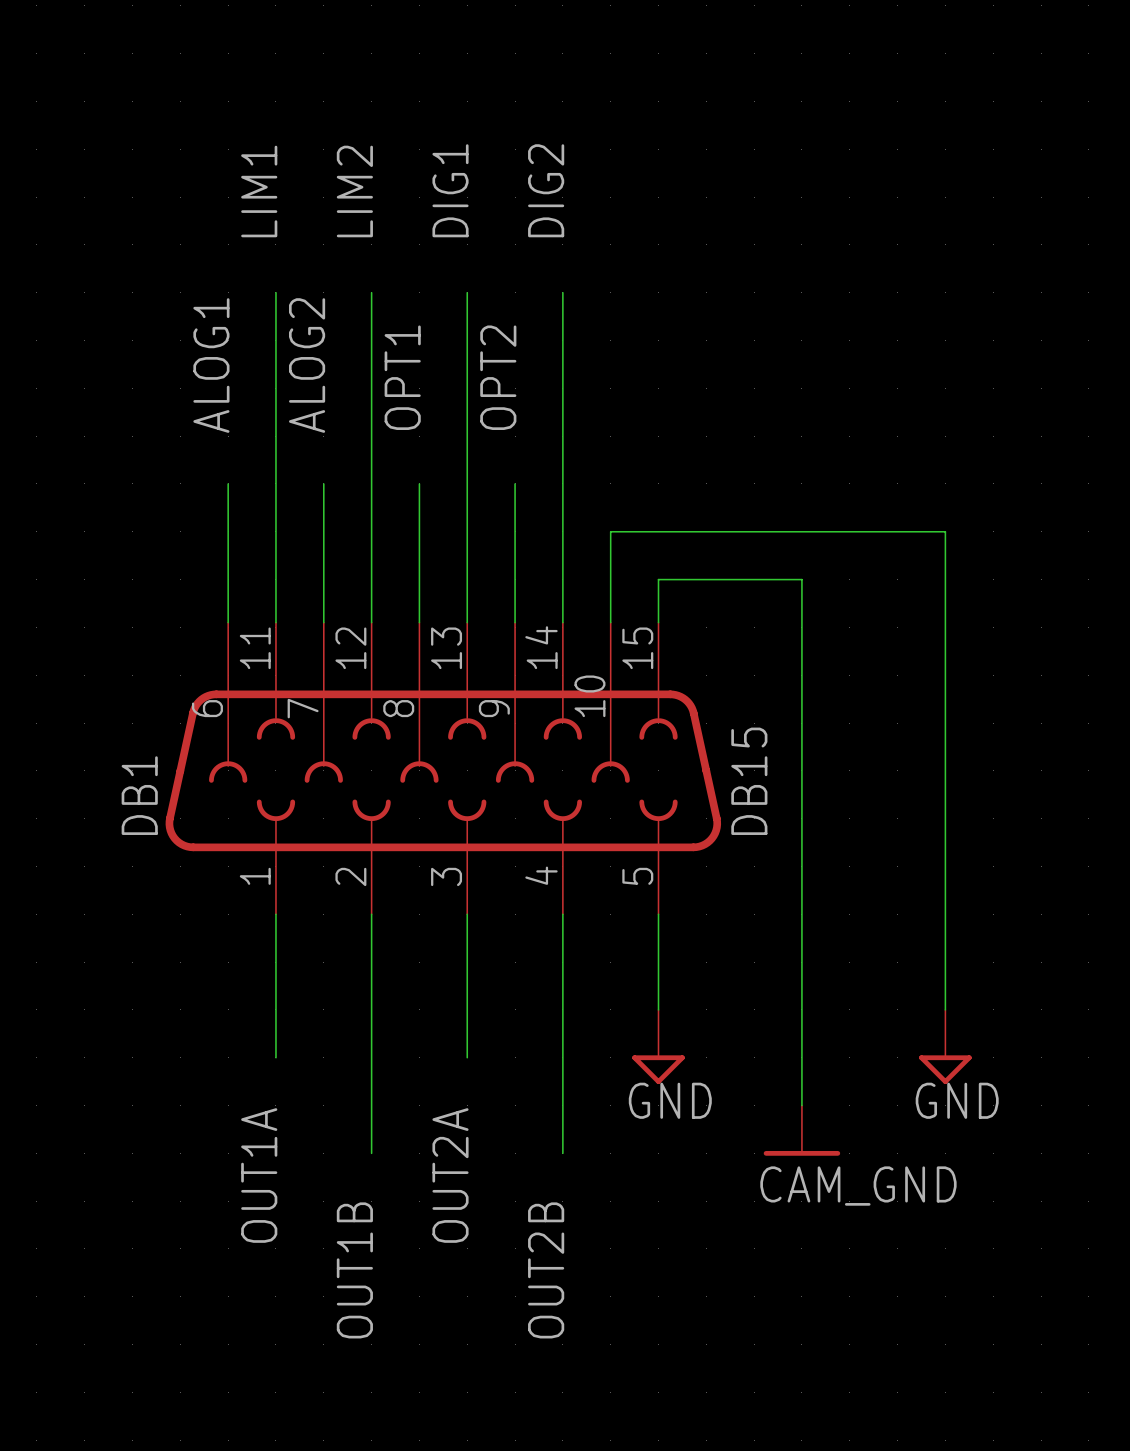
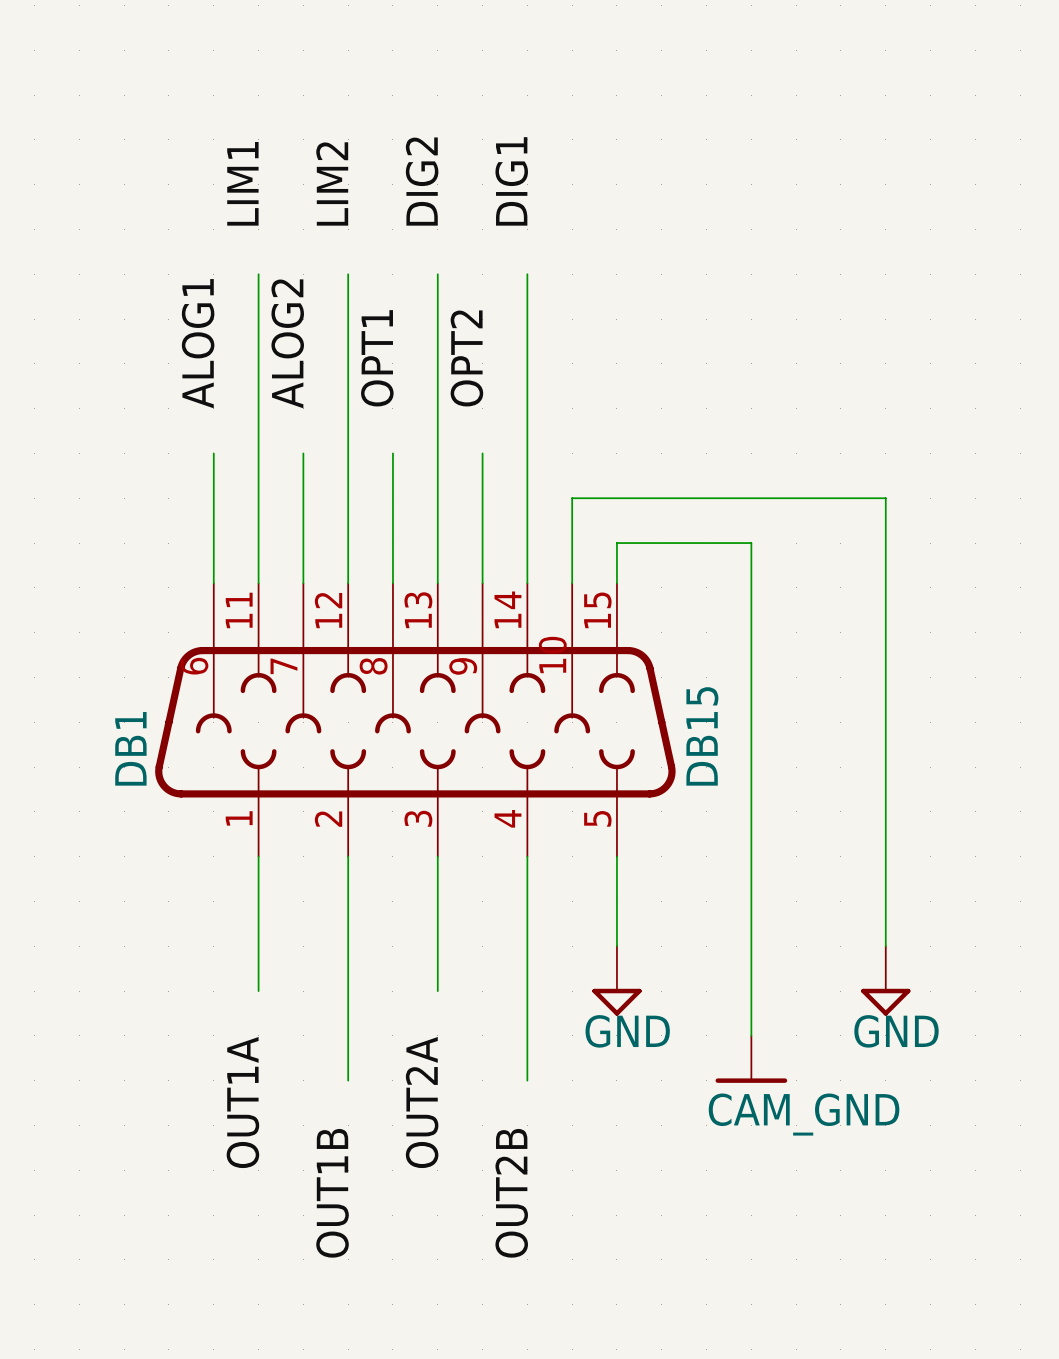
label: DIG1 (450, 190) -> DIG2 (422, 181)
label: DIG2 (546, 190) -> DIG1 (511, 181)

